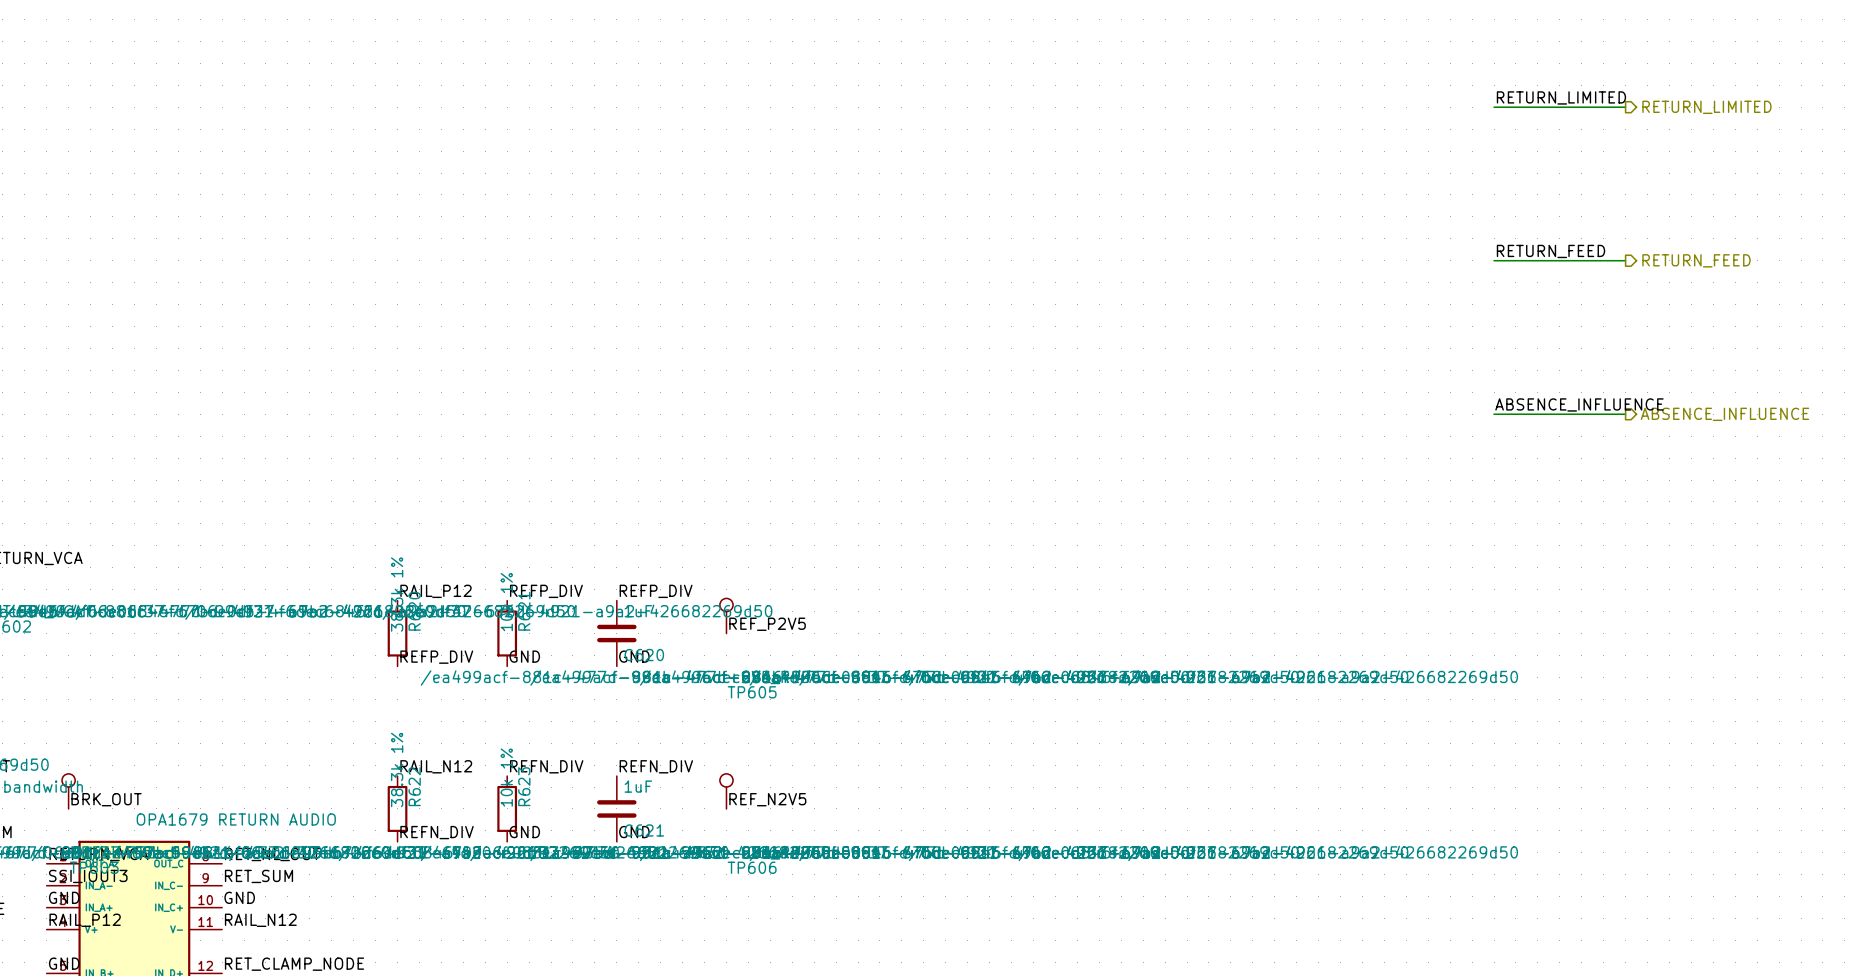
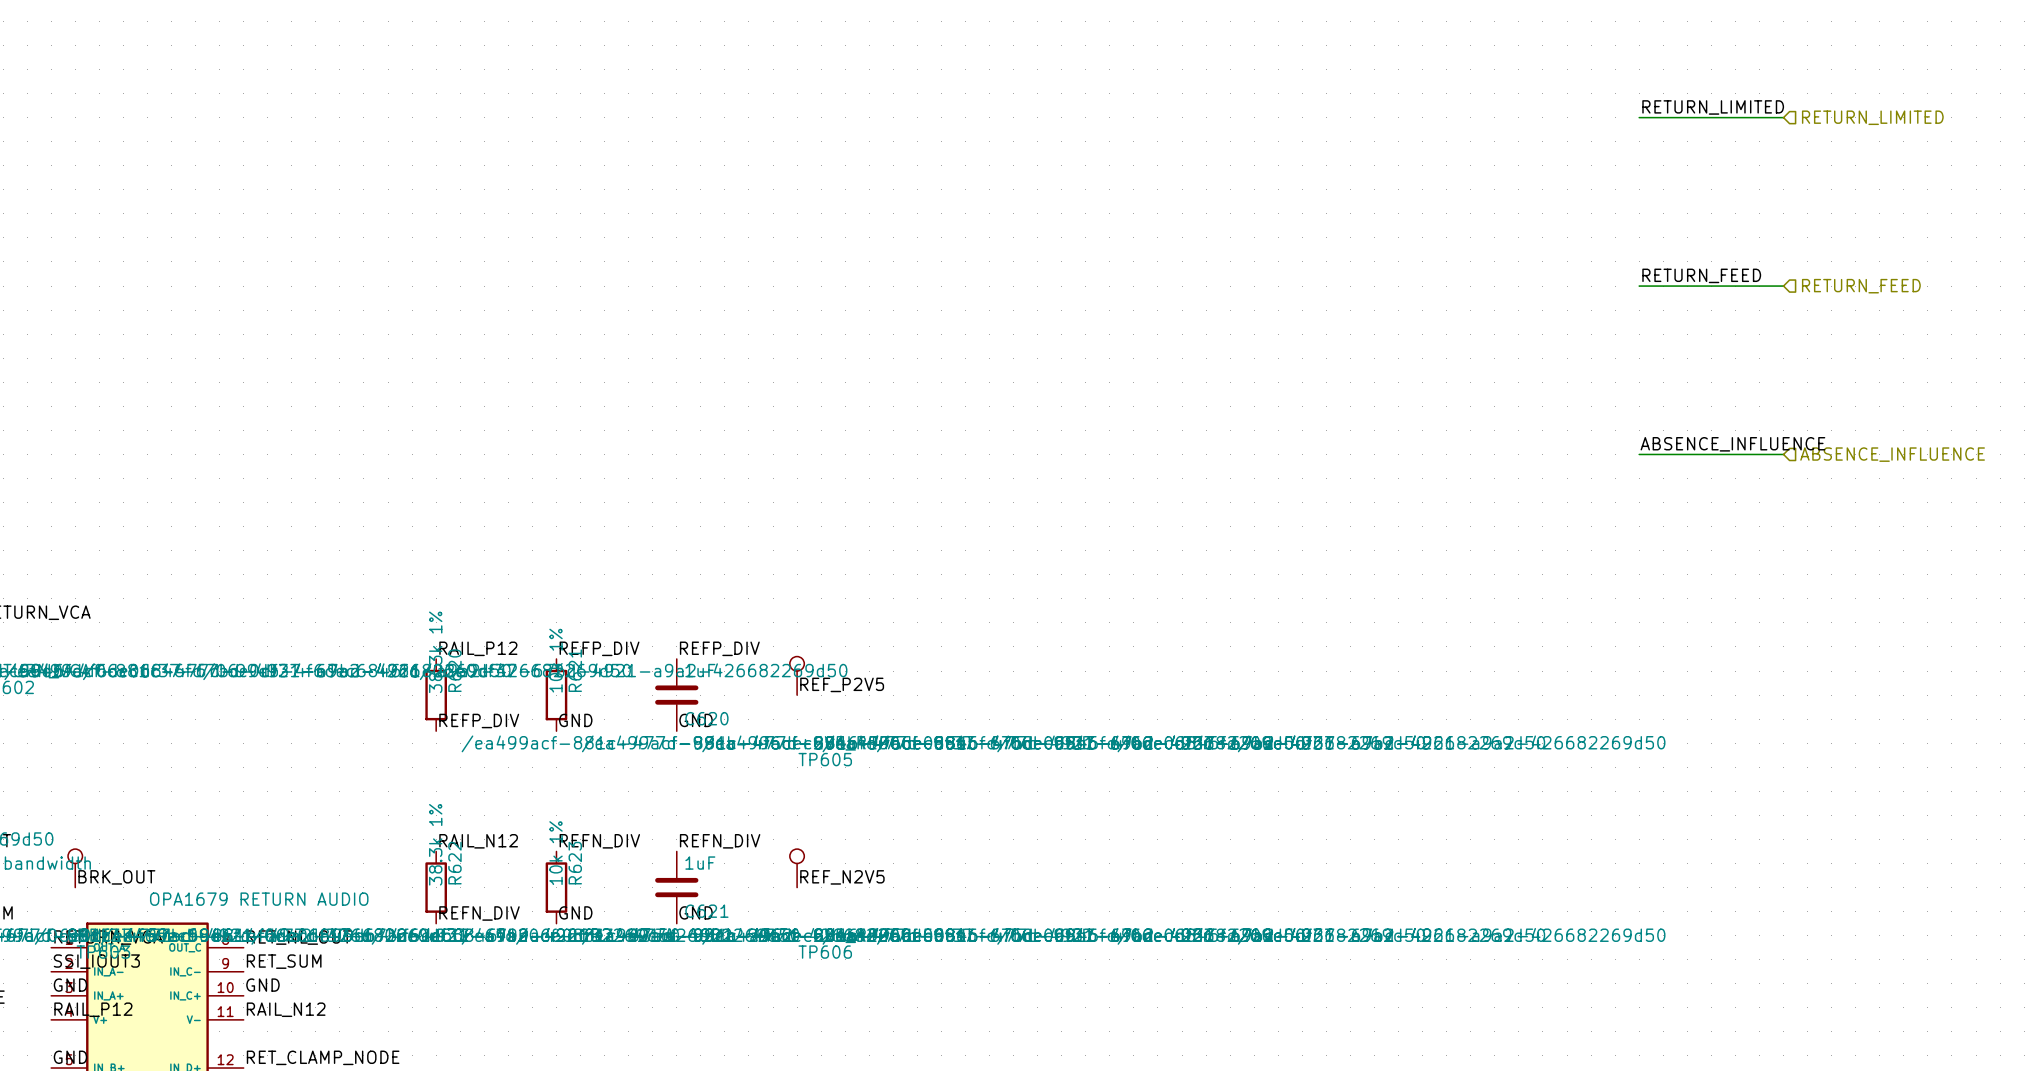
hierarchical label shape: output (1706, 107) -> input (1872, 117)
hierarchical label shape: output (1696, 260) -> input (1861, 286)
hierarchical label shape: output (1724, 414) -> input (1892, 454)

